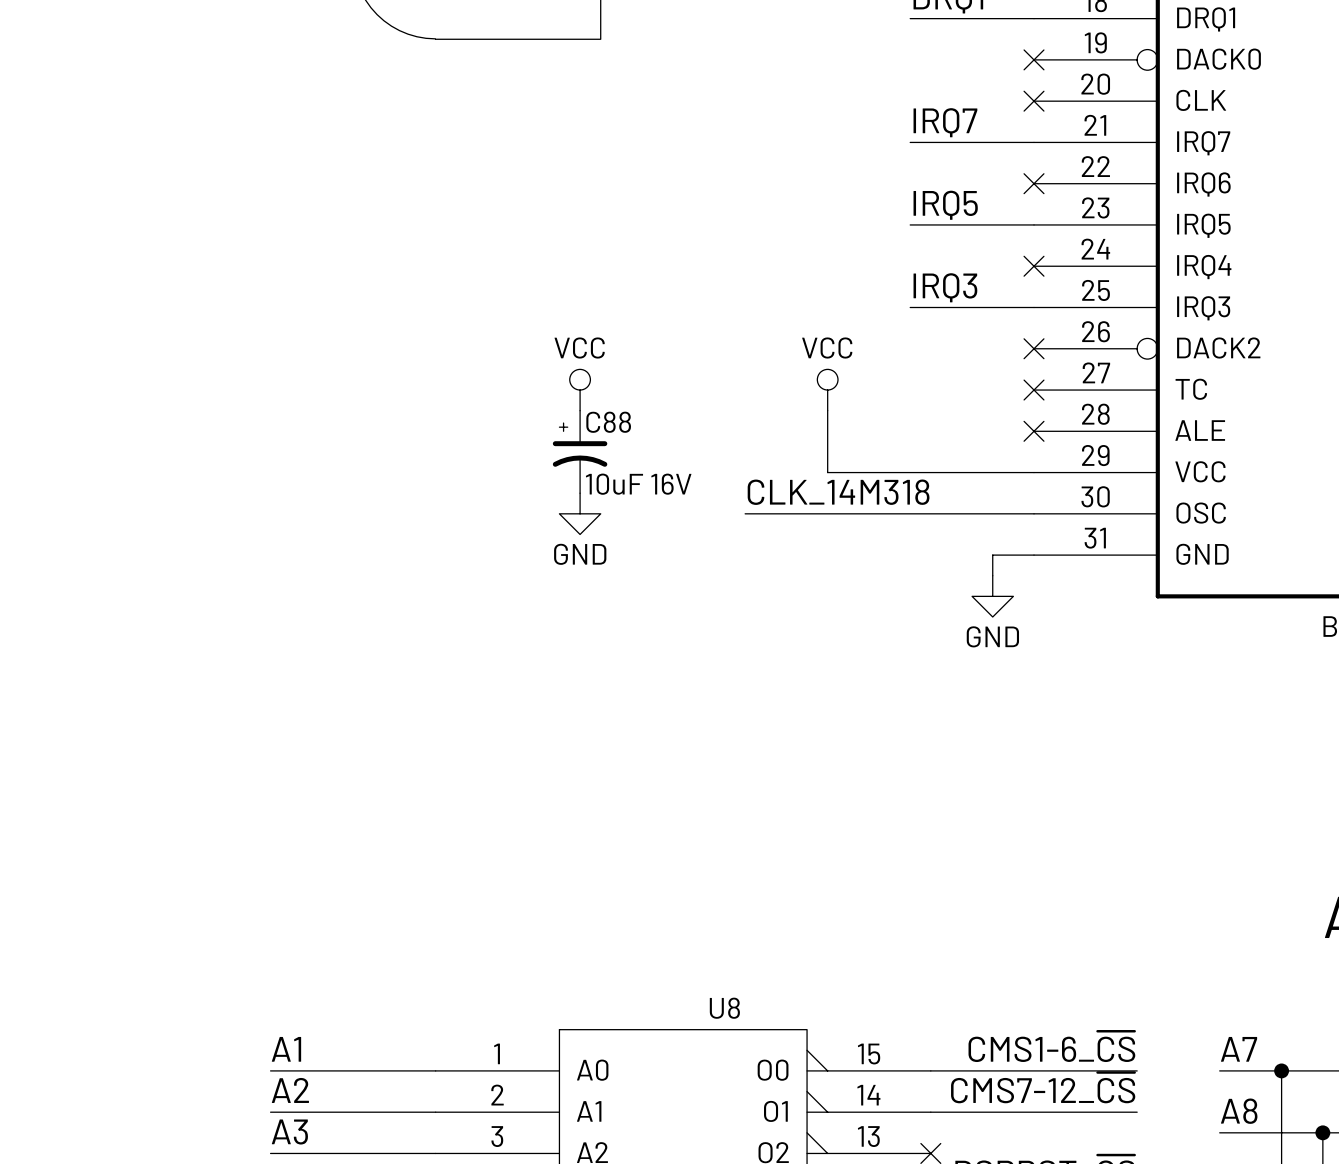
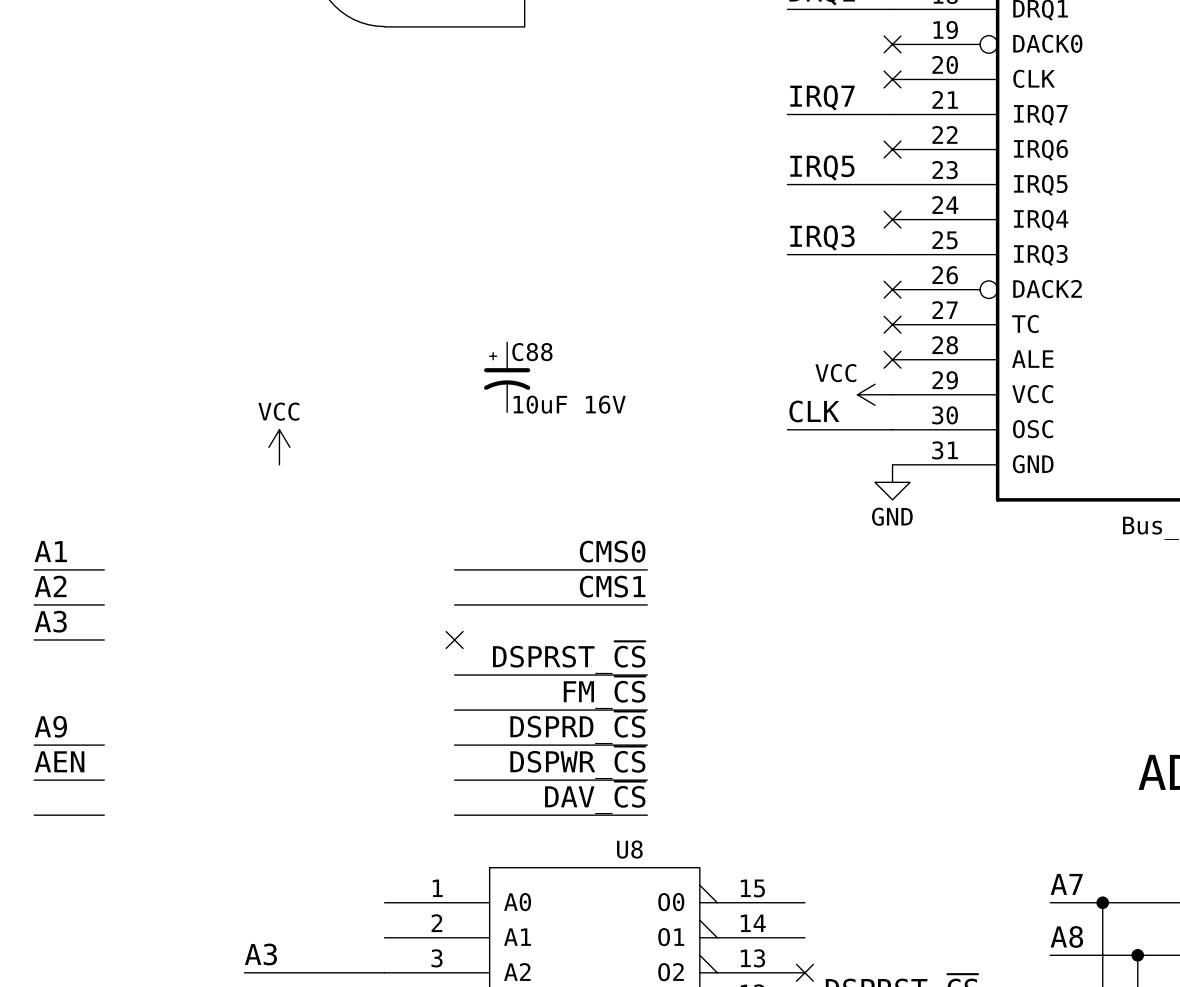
power symbol: VCC (580, 390) -> none
power symbol: VCC (827, 390) -> none
wire: (827, 410) (827, 472) (1034, 472) -> none
power symbol: none -> VCC (875, 394)
label: CLK_14M318 (838, 492) -> none
label: none -> CLK (814, 411)
power symbol: GND (580, 513) -> none
wire: (745, 513) (910, 513) -> none
power symbol: none -> VCC (279, 447)
wire: (1034, 555) (992, 555) (992, 575) -> none
power symbol position: GND (992, 596) -> GND (892, 482)
label: none -> A1 (50, 551)
label: none -> CMS0 (612, 551)
wire: none -> (34, 569) (104, 569)
wire: none -> (454, 569) (647, 569)
label: none -> A2 (50, 586)
label: none -> CMS1 (612, 586)
wire: none -> (34, 604) (104, 604)
wire: none -> (454, 604) (647, 604)
label: none -> A3 (50, 621)
wire: none -> (34, 639) (104, 639)
no-connect mark: none -> (454, 639)
label: none -> DSPRST_~{CS} (569, 657)
wire: none -> (454, 675) (647, 675)
label: none -> FM_~{CS} (604, 692)
wire: none -> (454, 710) (647, 710)
label: none -> DSPRD_~{CS} (577, 727)
label: none -> A9 (50, 726)
wire: none -> (34, 745) (104, 745)
wire: none -> (454, 745) (647, 745)
label: none -> DSPWR_~{CS} (577, 762)
label: none -> AEN (59, 761)
wire: none -> (34, 780) (104, 780)
wire: none -> (454, 780) (647, 780)
label: none -> DAV_~{CS} (595, 797)
wire: none -> (34, 815) (104, 815)
wire: none -> (454, 815) (647, 815)
label: CMS1-6_~{CS} (1051, 1046) -> none
label: A1 (286, 1049) -> none
wire: (270, 1070) (435, 1070) -> none
wire: (930, 1070) (1137, 1070) -> none
label: CMS7-12_~{CS} (1043, 1087) -> none
label: A2 (290, 1090) -> none
wire: (270, 1112) (435, 1112) -> none
wire: (930, 1112) (1137, 1112) -> none

